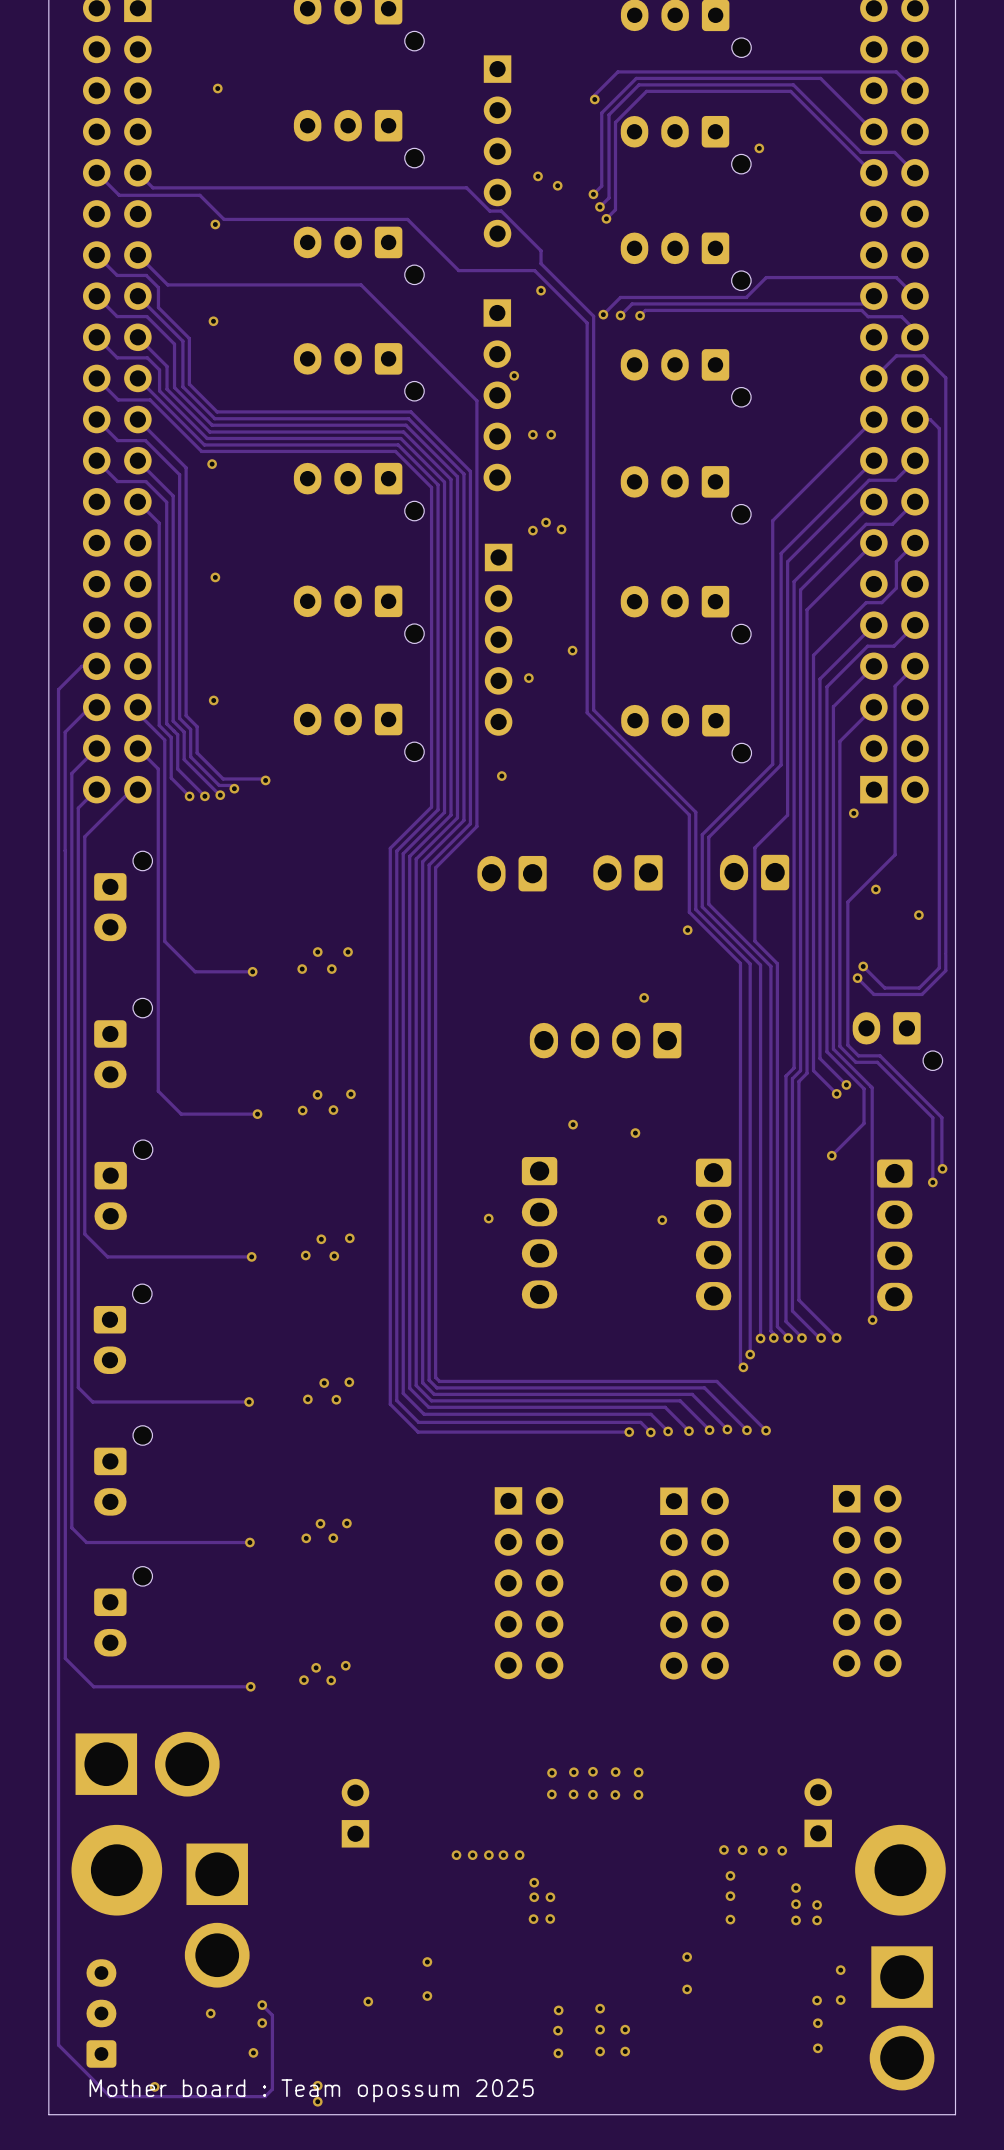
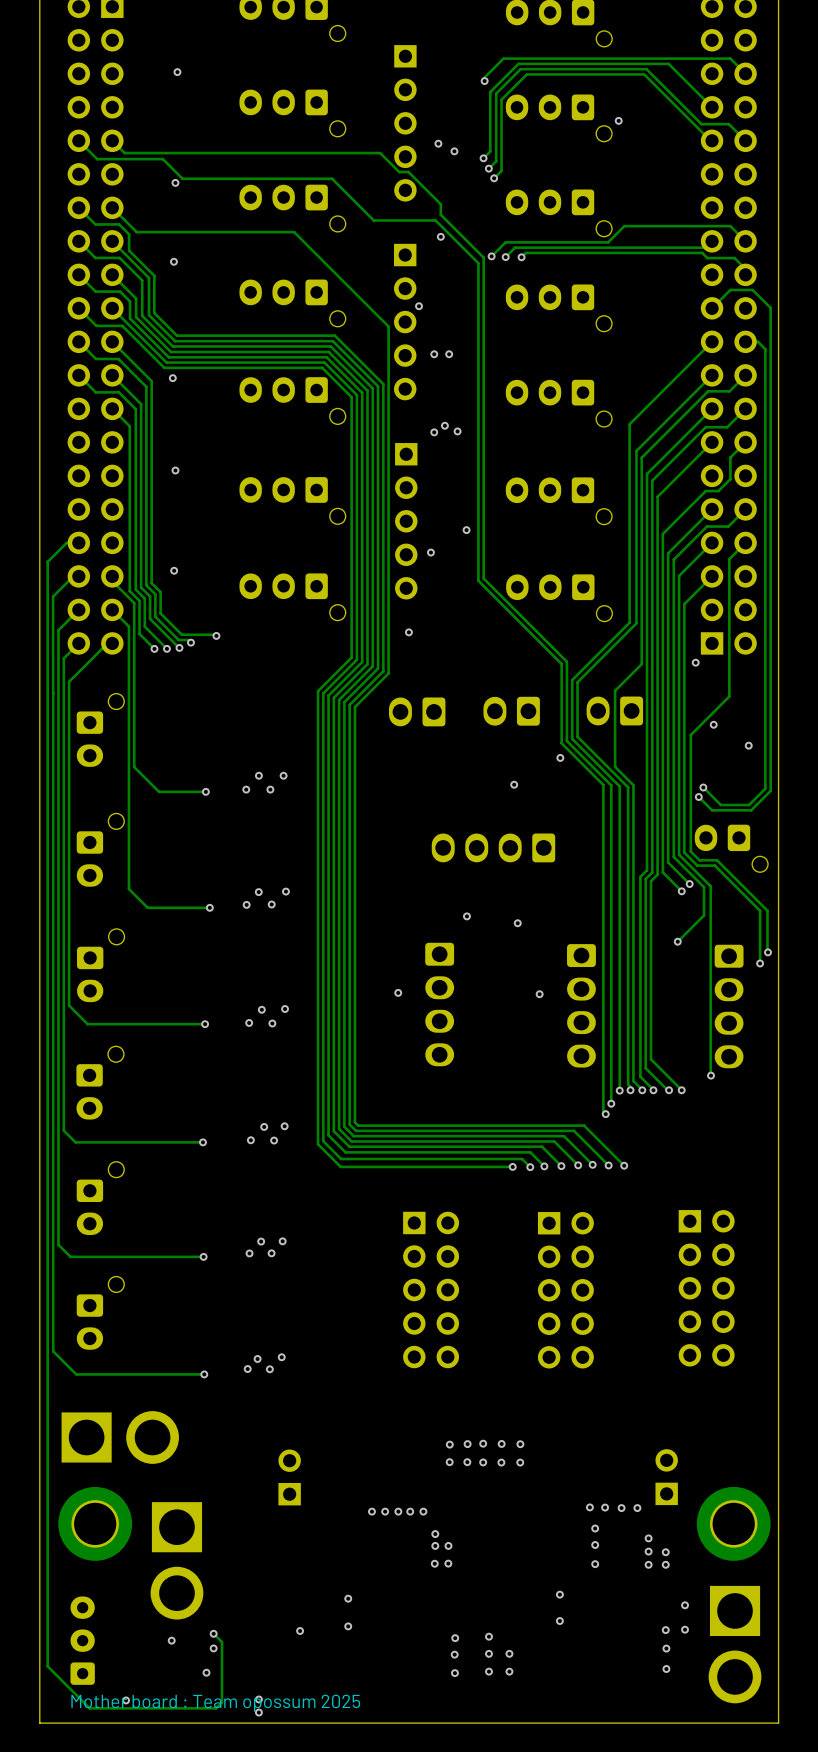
via position: (644, 997) -> (514, 784)

